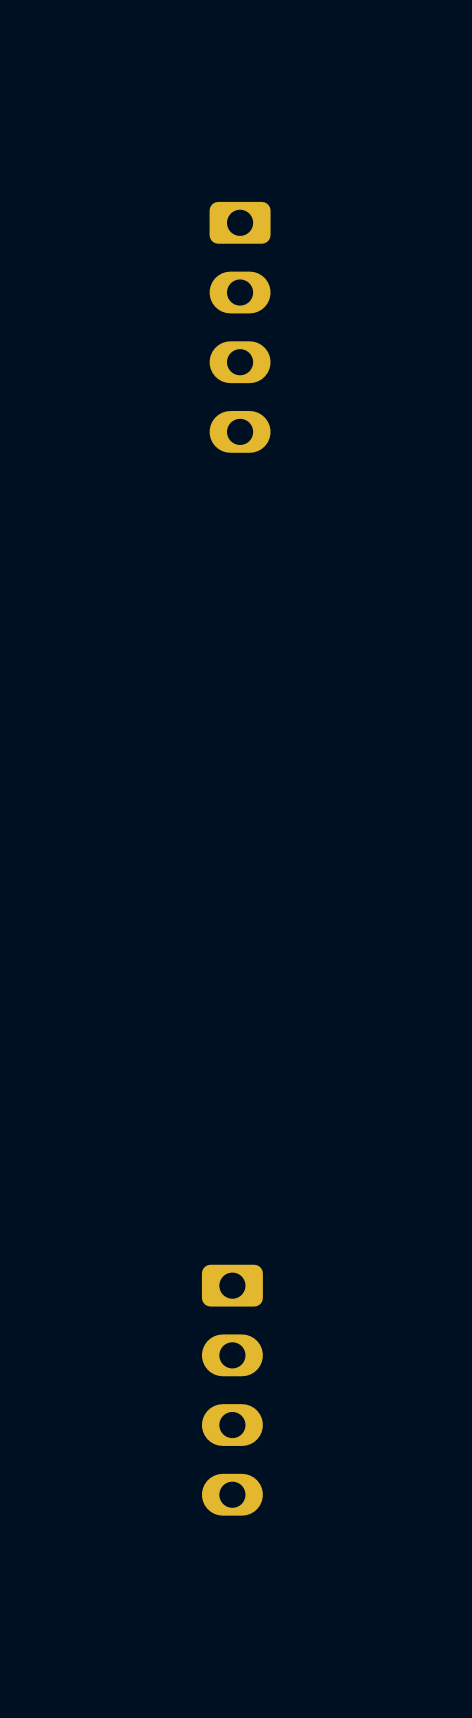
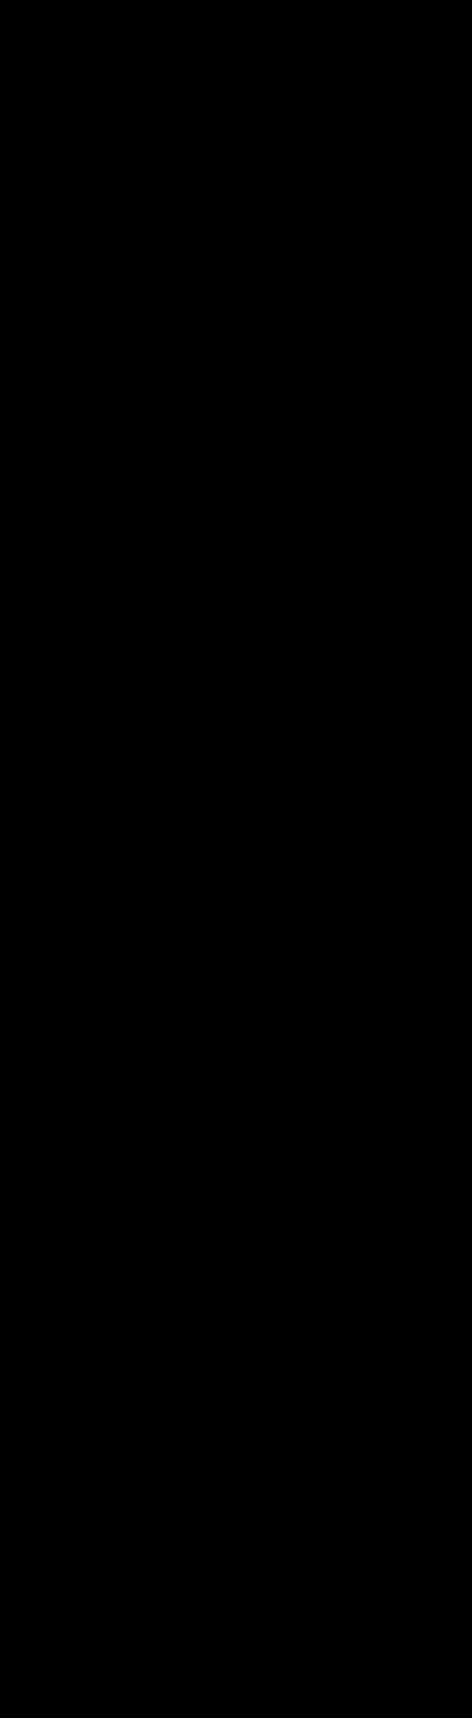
part: (240, 327) -> none
part: (232, 1390) -> none

